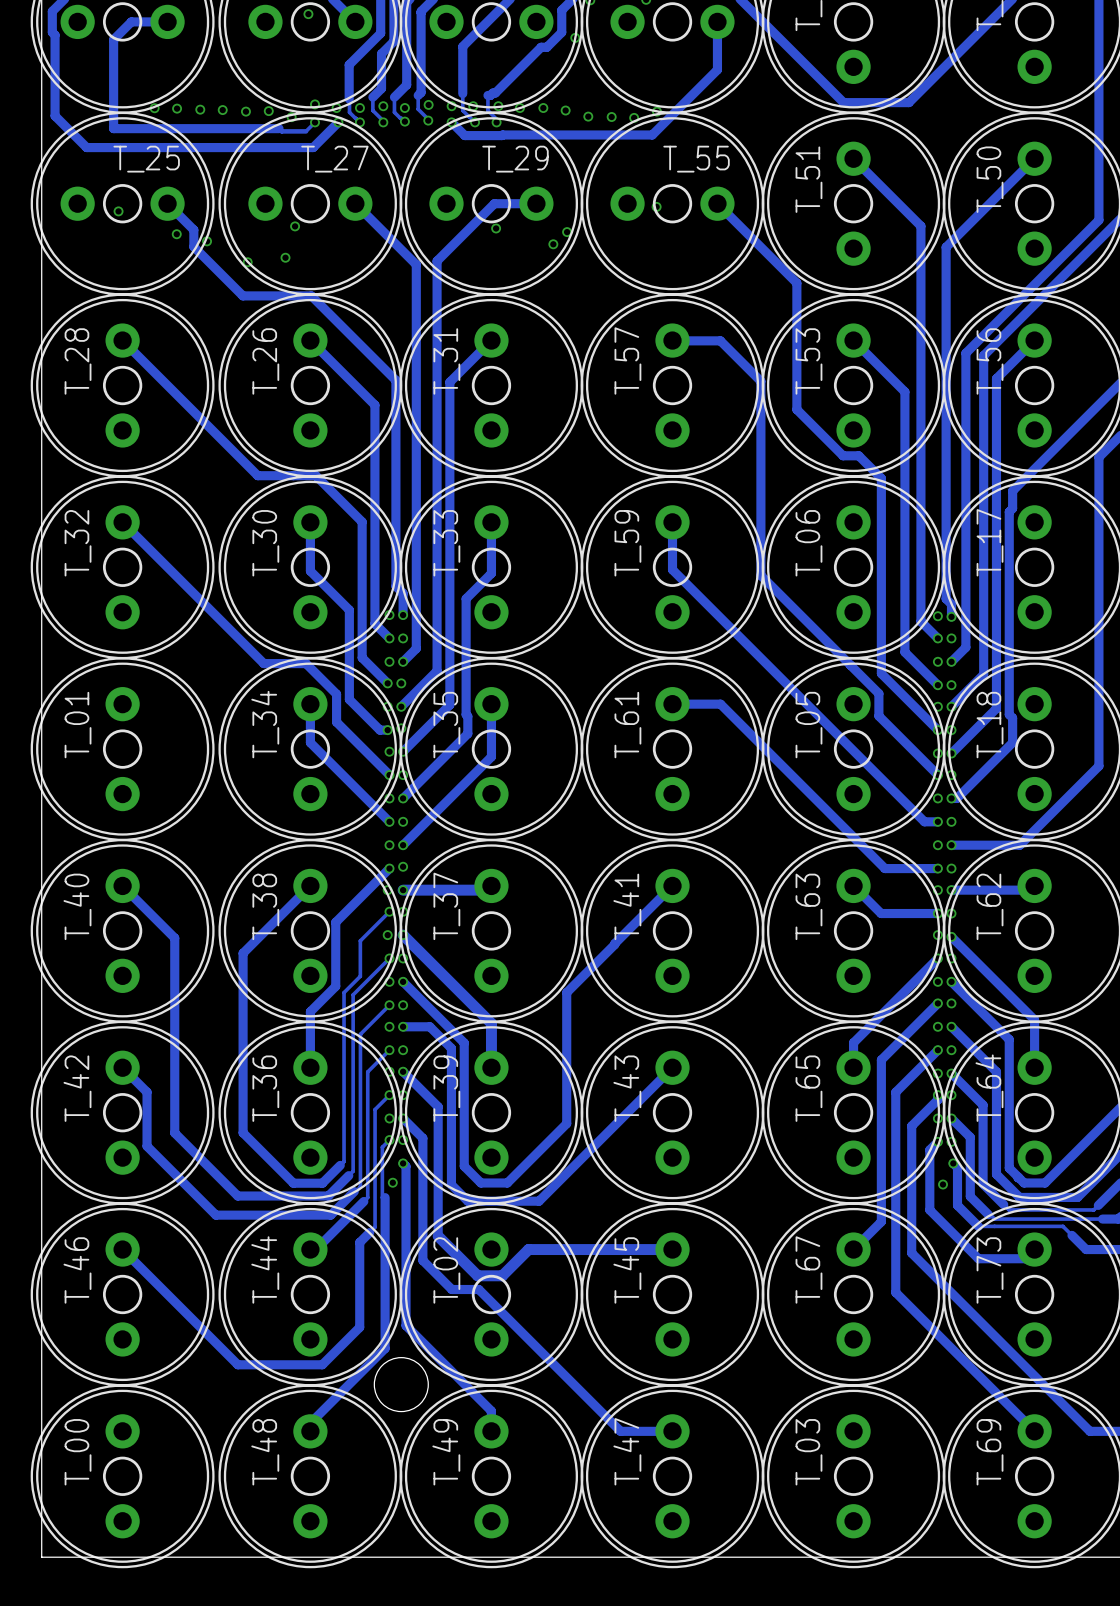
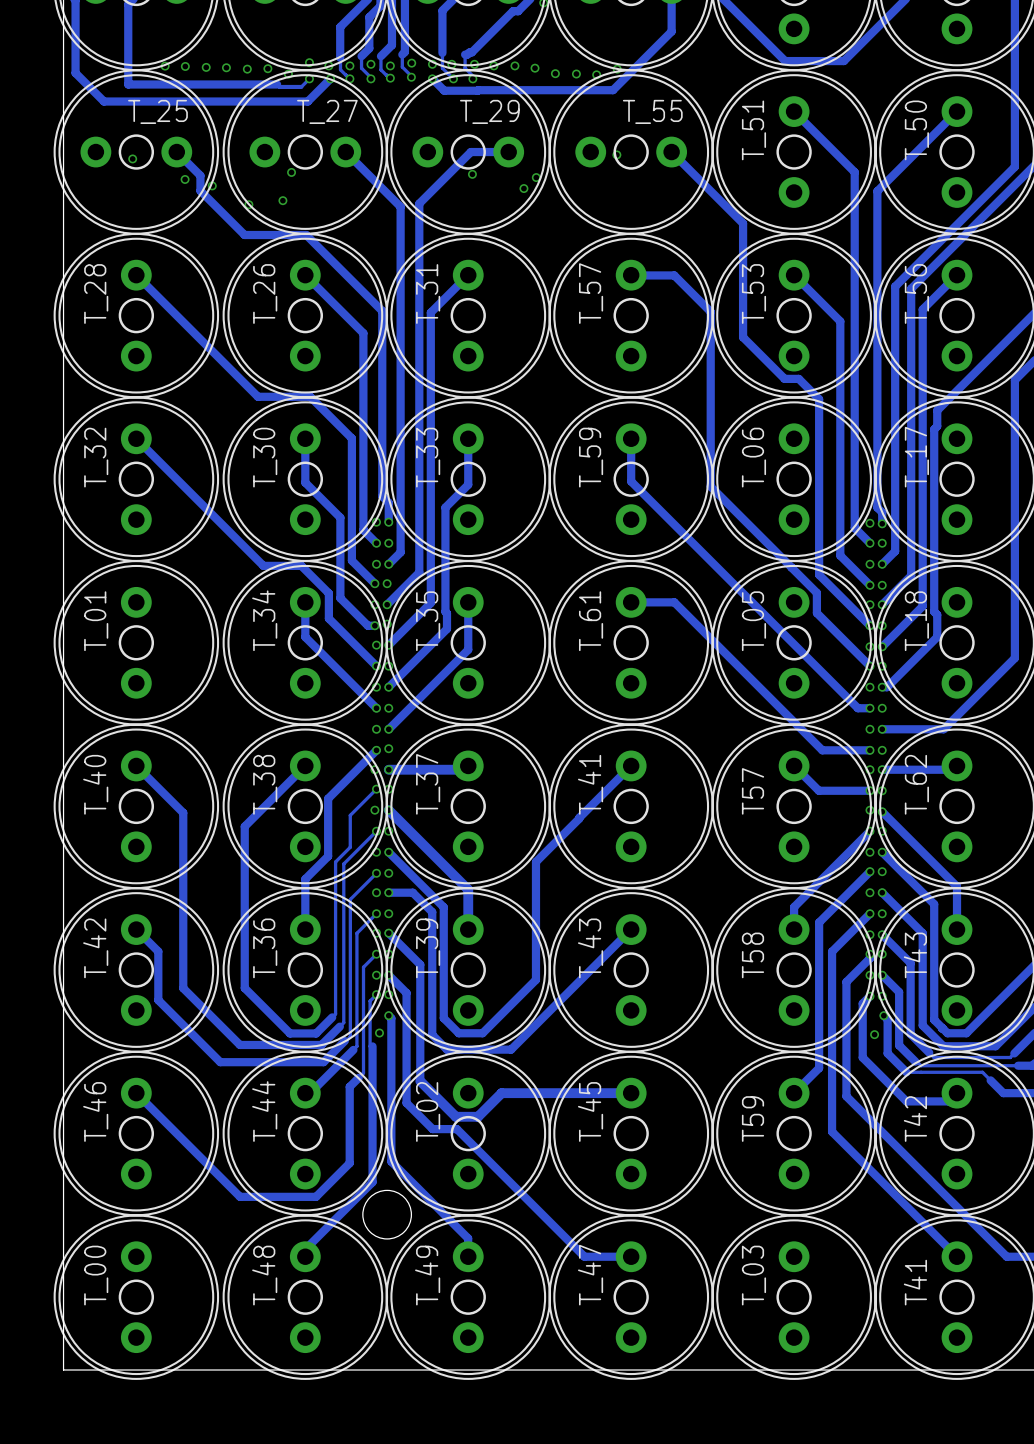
T_63 name: T_63 (808, 906) -> T57 (753, 791)
T_65 name: T_65 (808, 1088) -> T58 (753, 955)
T_64 name: T_64 (989, 1088) -> T43 (915, 955)
T_67 name: T_67 (808, 1269) -> T59 (753, 1119)
T_73 name: T_73 (990, 1270) -> T42 (915, 1119)
T_69 name: T_69 (990, 1452) -> T41 (915, 1282)

